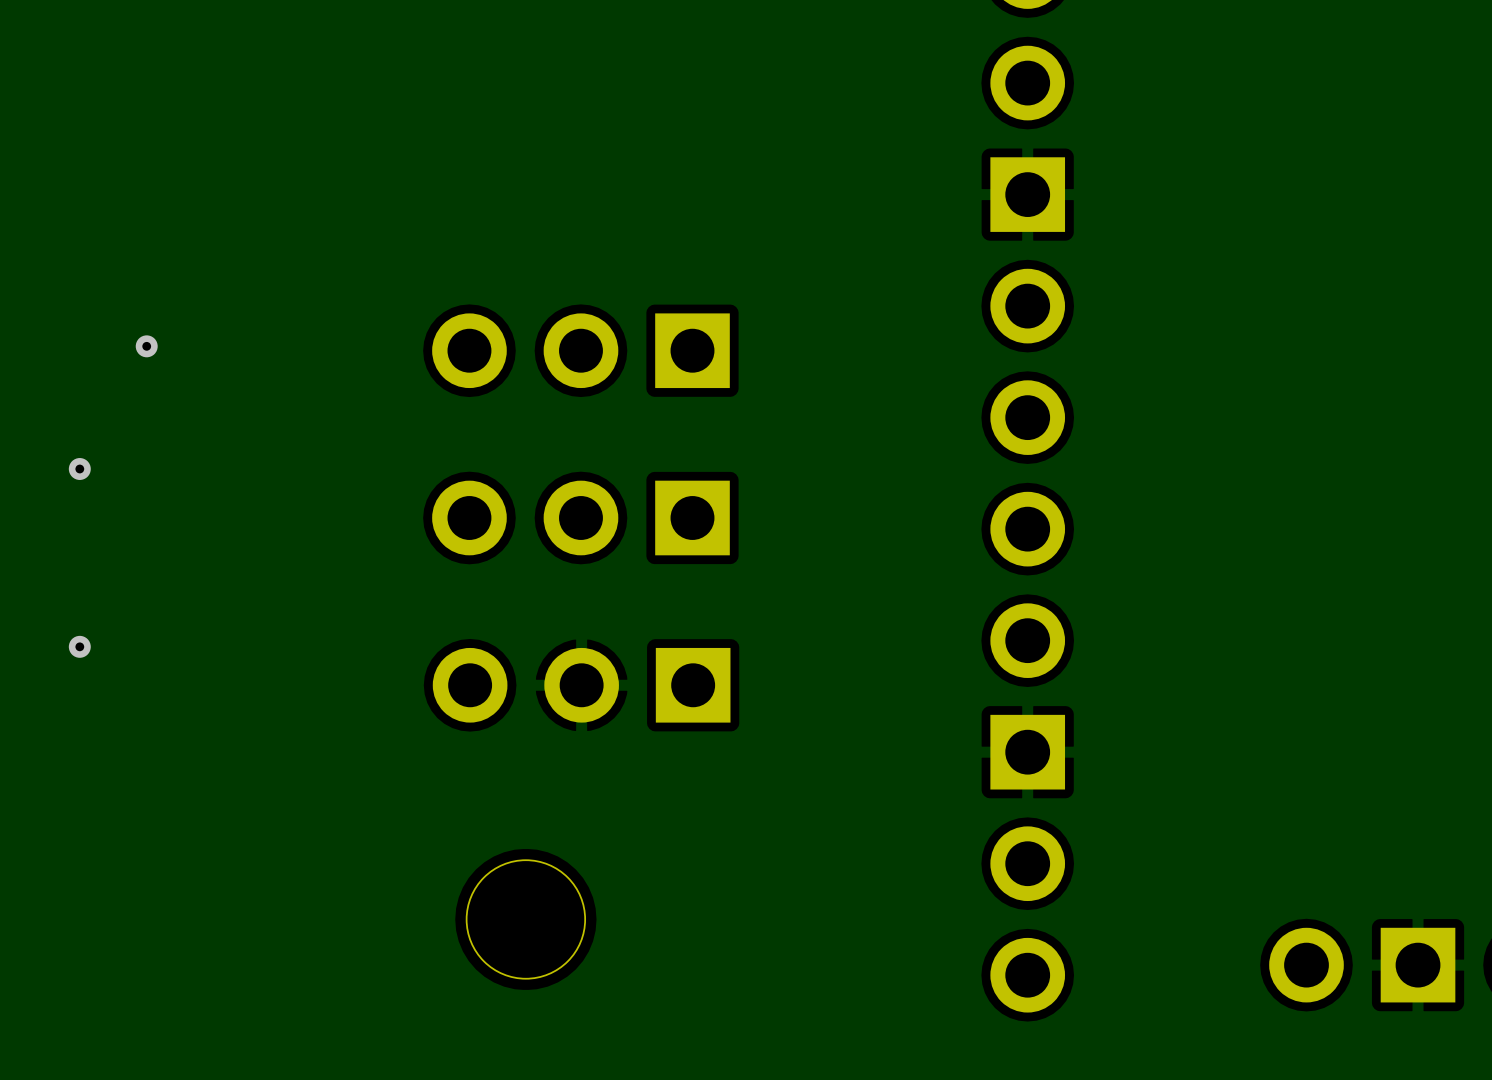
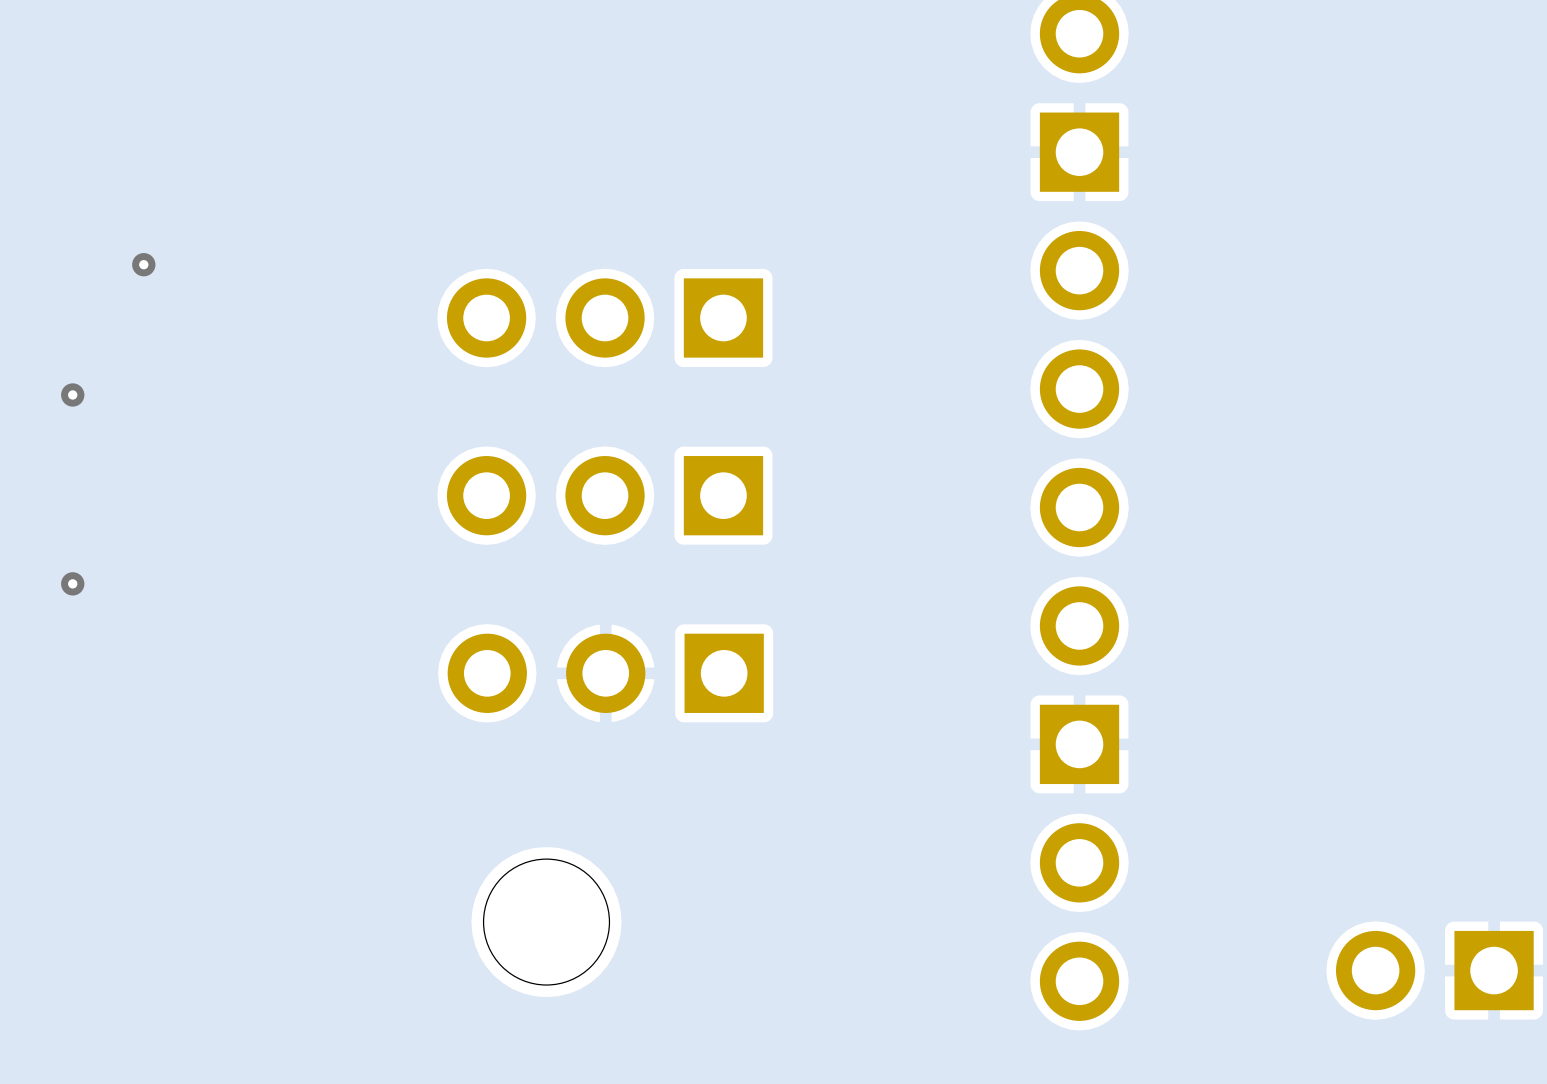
via position: (146, 346) -> (143, 264)
via position: (79, 469) -> (72, 394)
via position: (79, 646) -> (72, 583)

